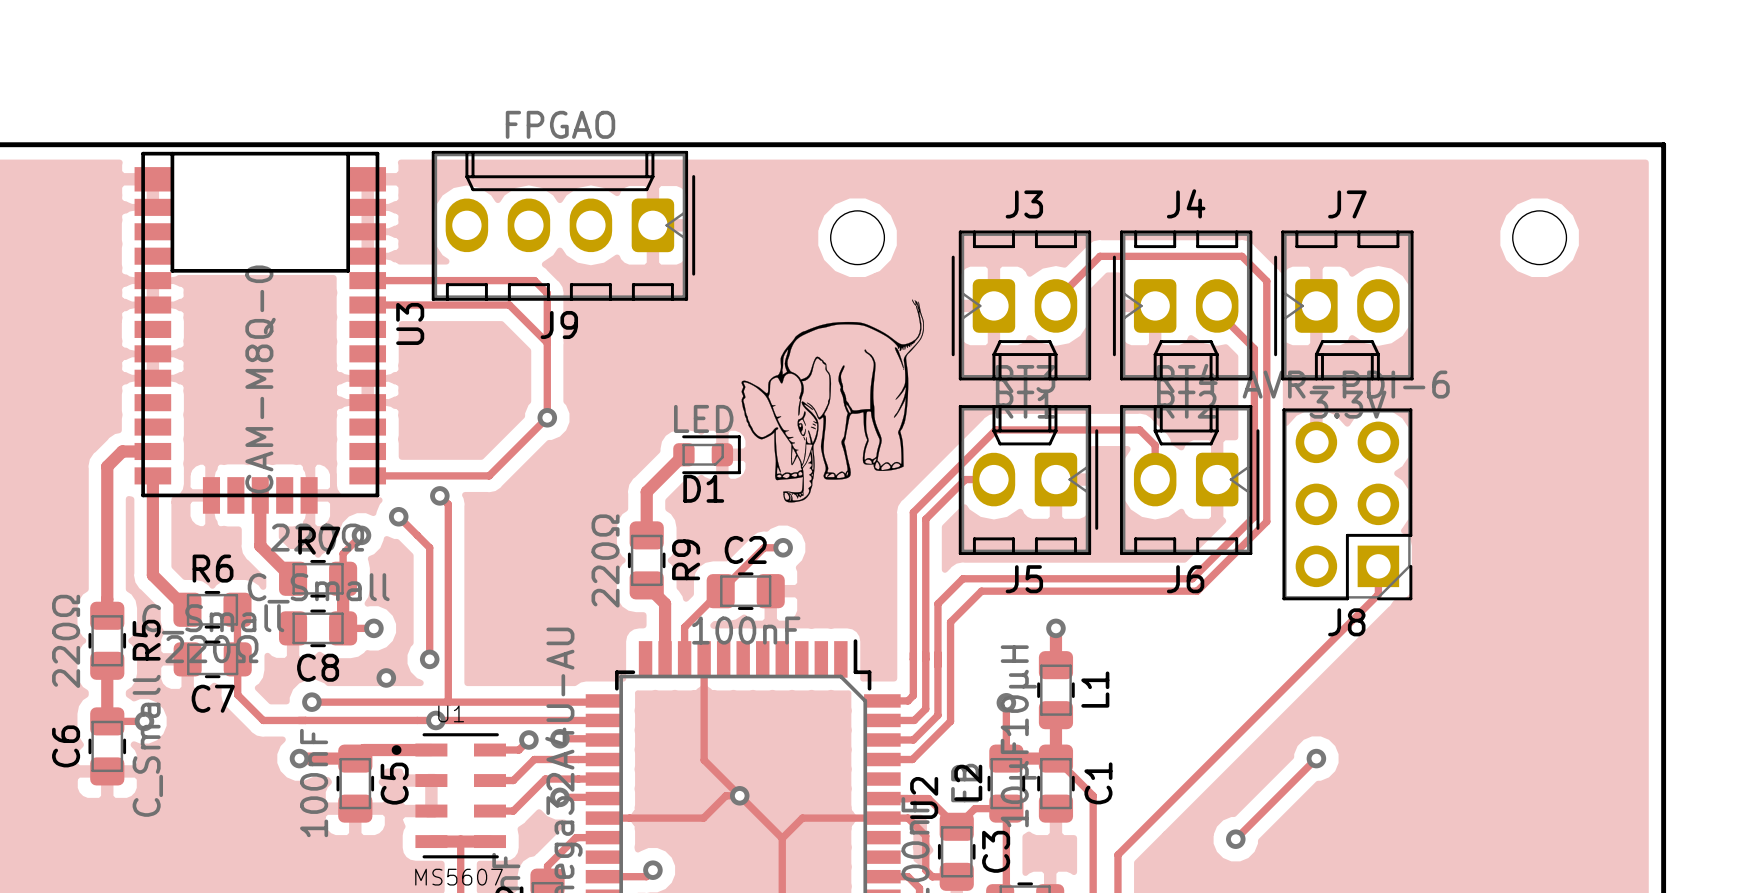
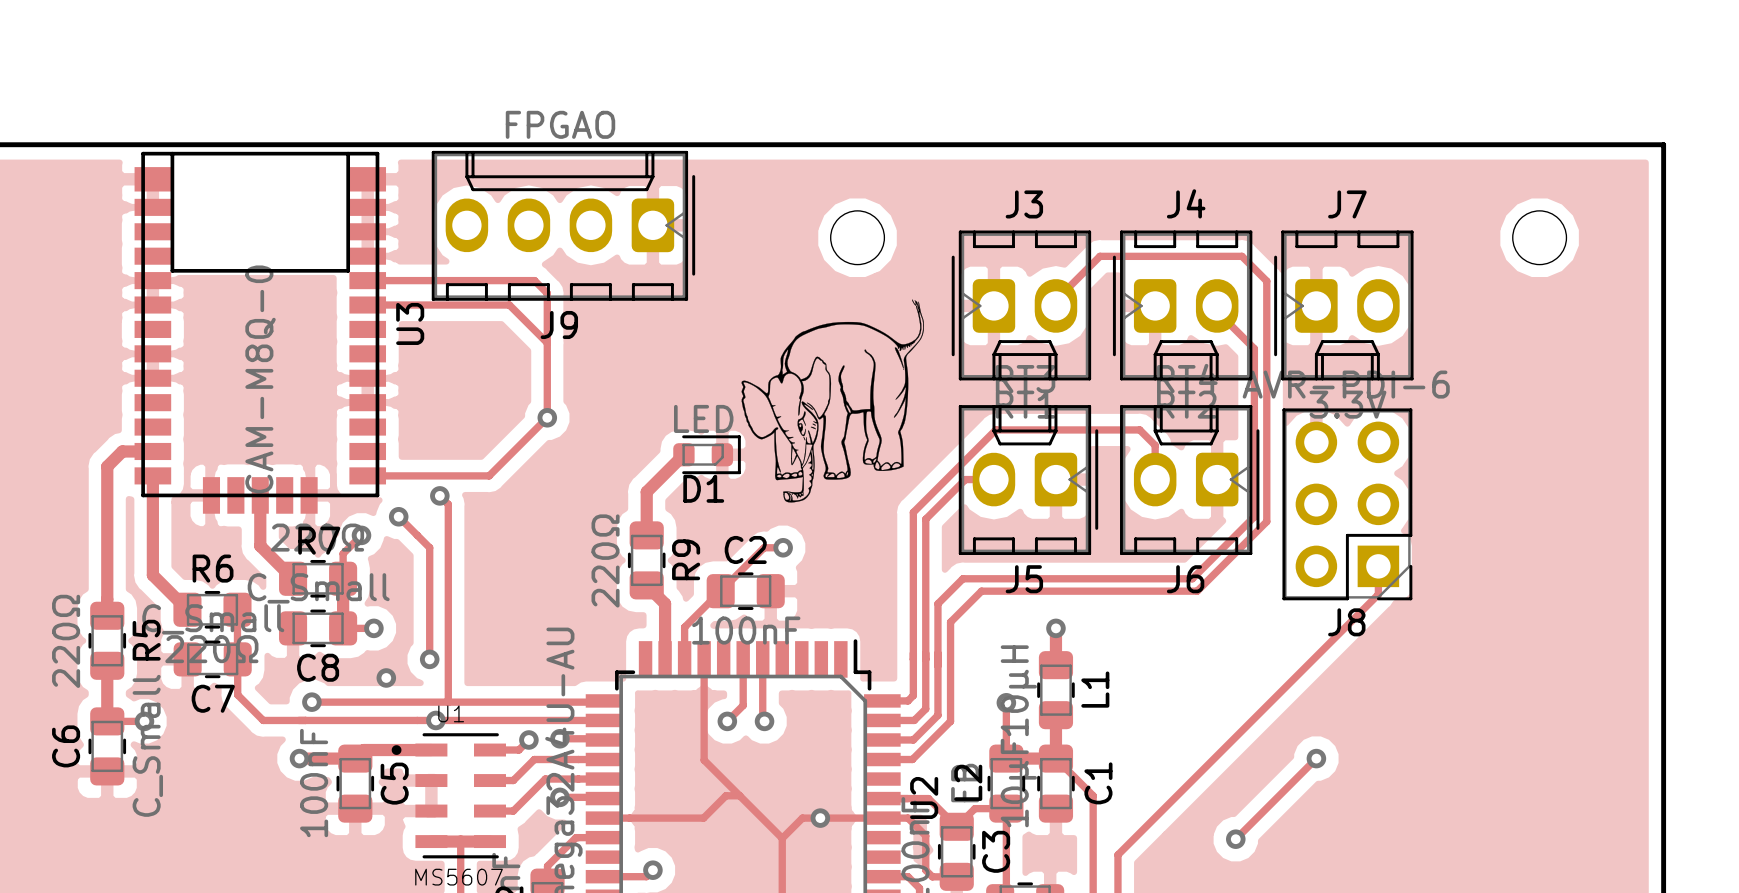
track: none -> (743, 659) (743, 705) (727, 721)
track: none -> (762, 659) (762, 719) (764, 721)
via: none -> (727, 721)
via: none -> (764, 721)
via: (739, 795) -> none
via: none -> (820, 818)

